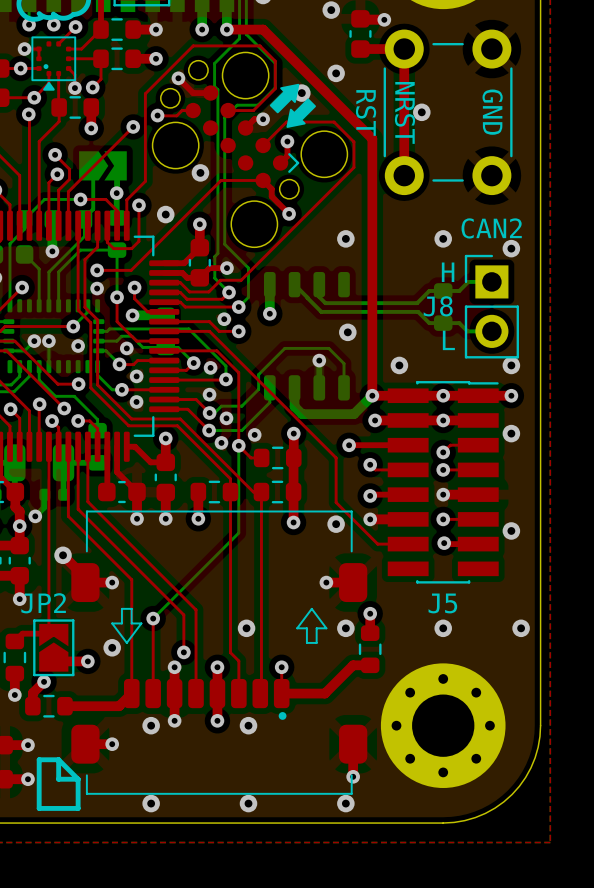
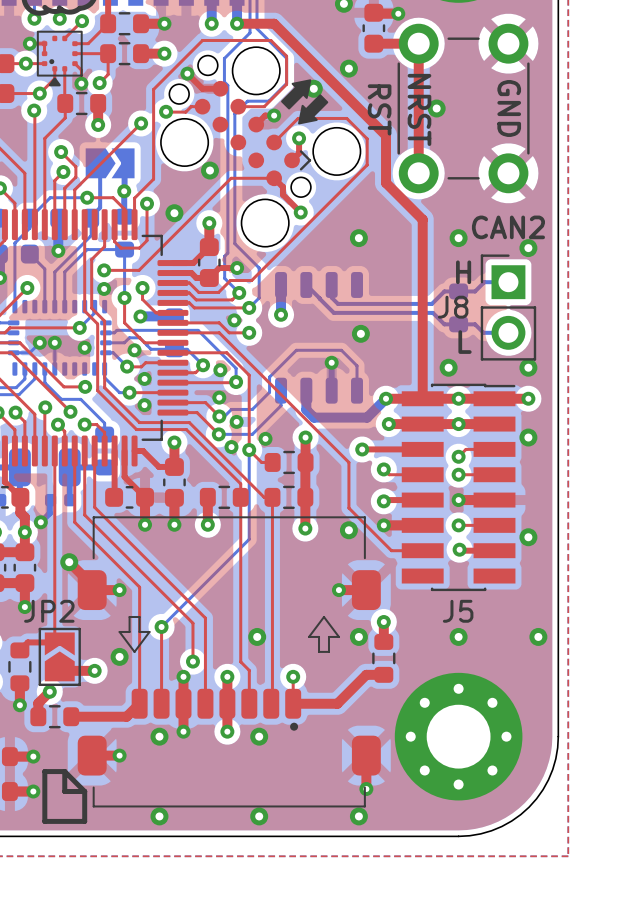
top track: (372, 185) (372, 395) -> (386, 182) (422, 219) (422, 398)
via position: (399, 365) -> (448, 367)

